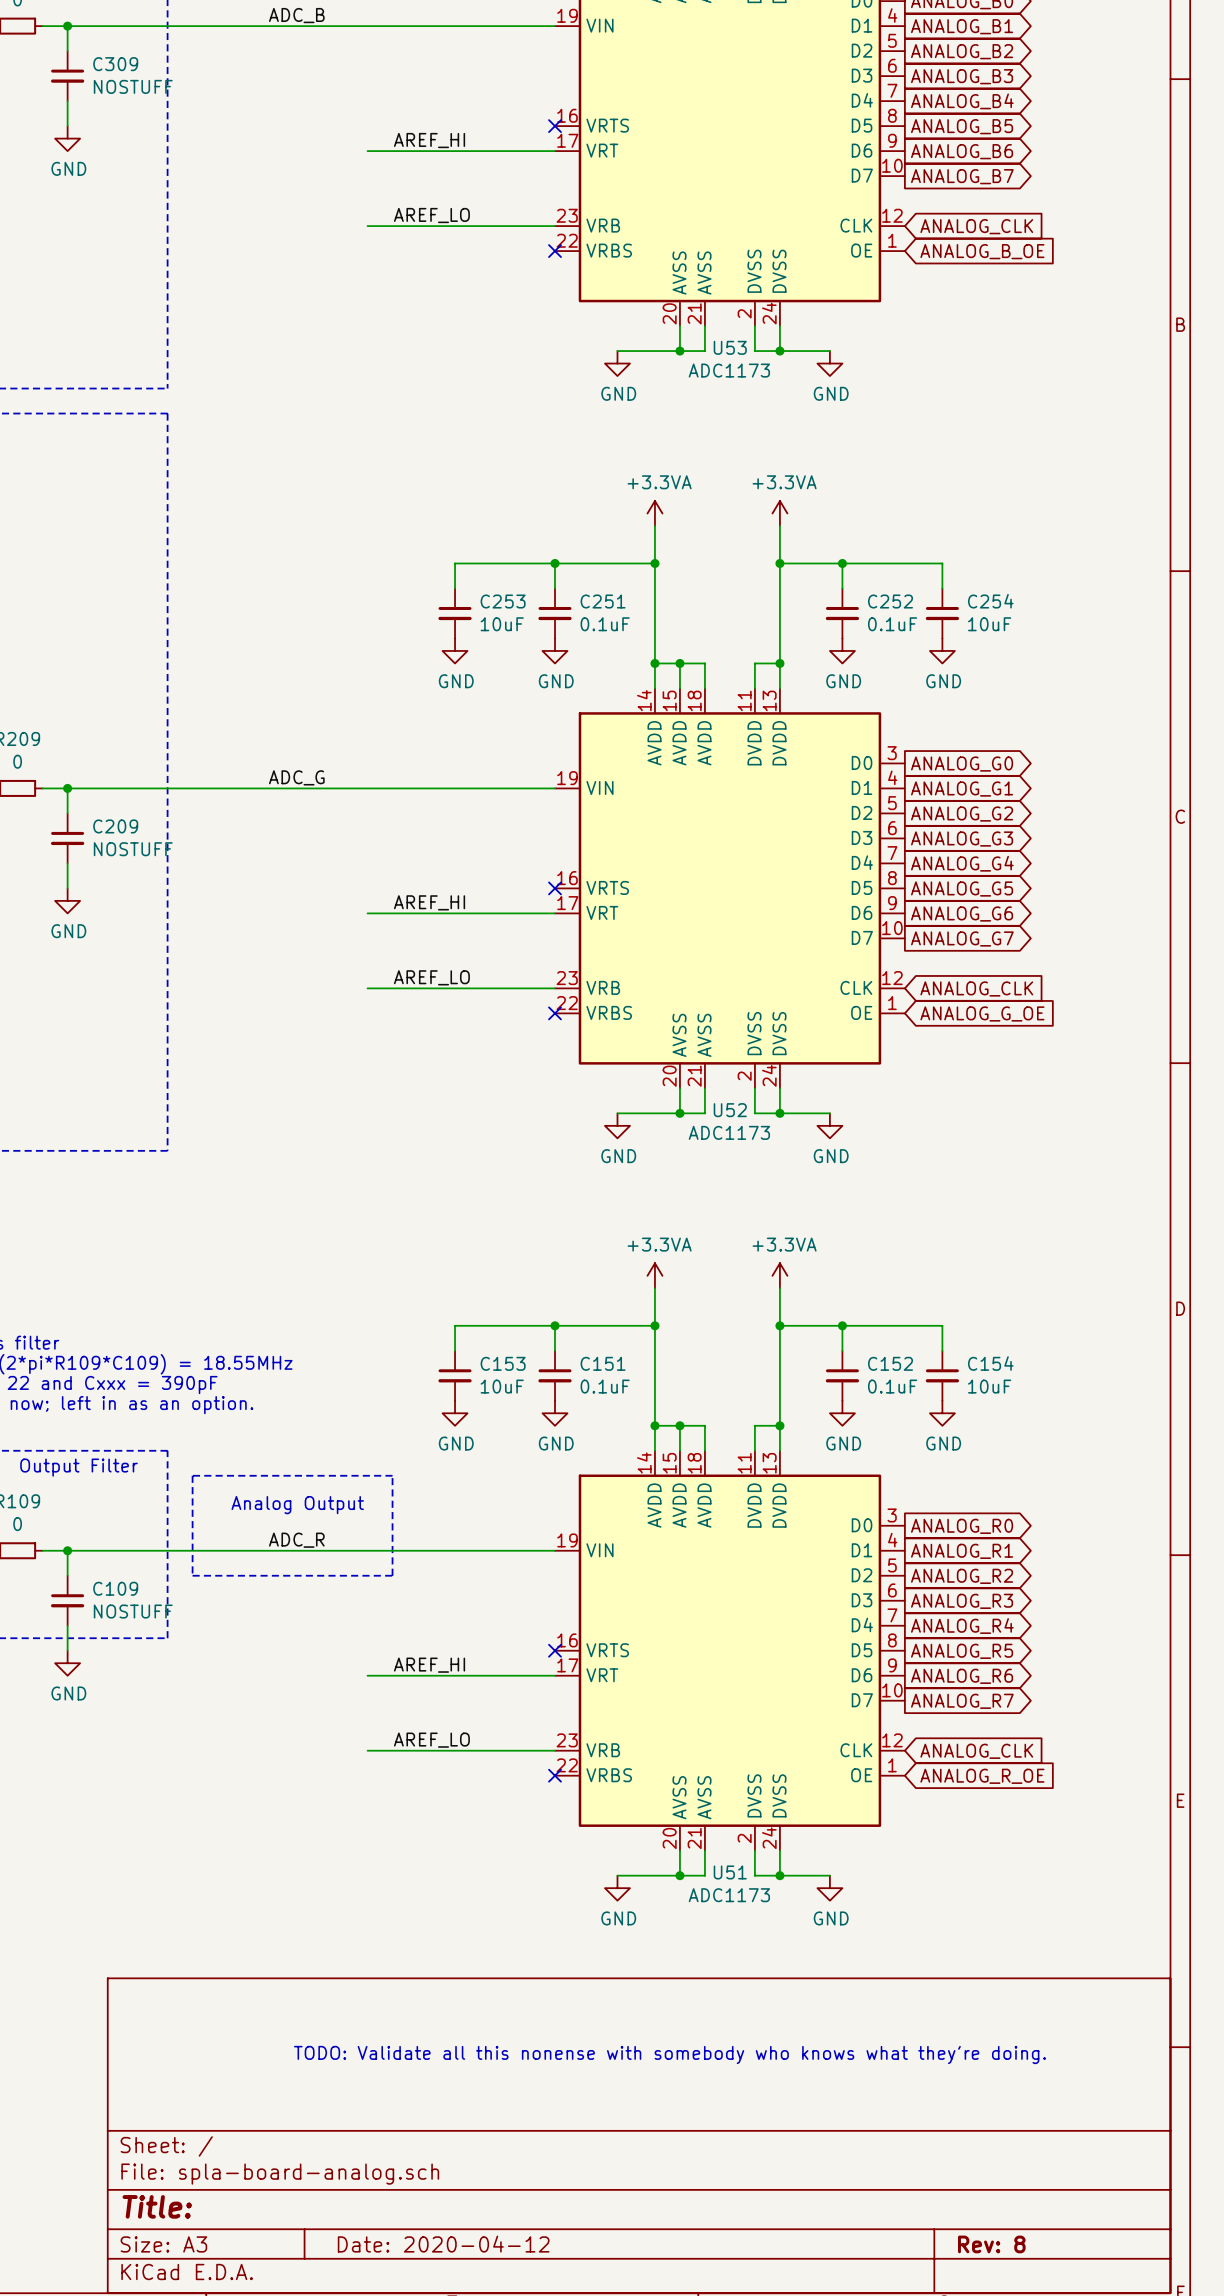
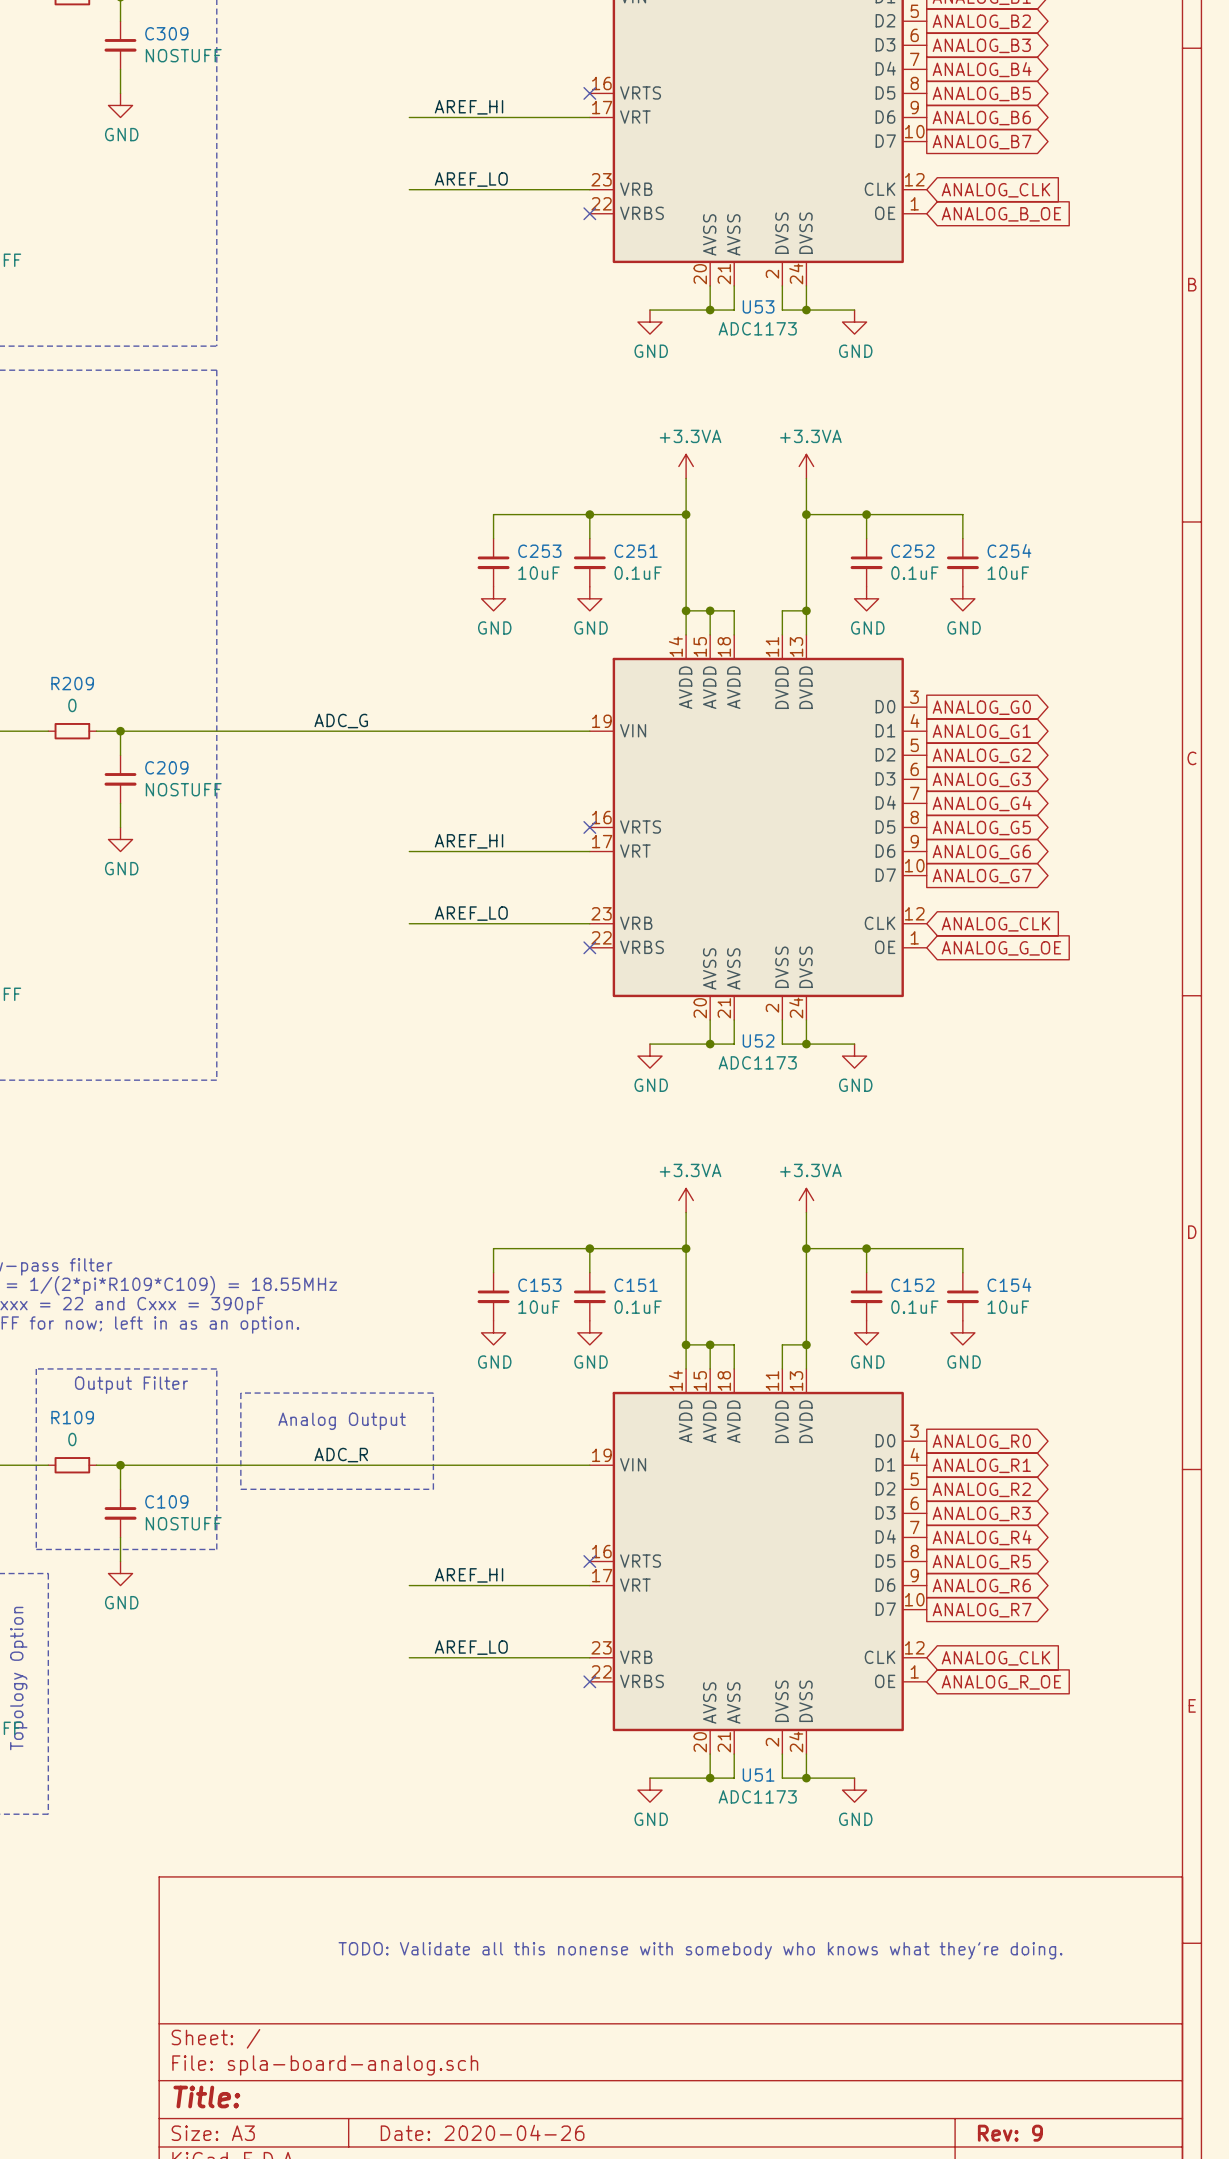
title block: Date: 2020-04-12 (443, 2244) -> Date: 2020-04-26 (482, 2132)
title block: Rev: 8 (991, 2244) -> Rev: 9 (1010, 2133)

